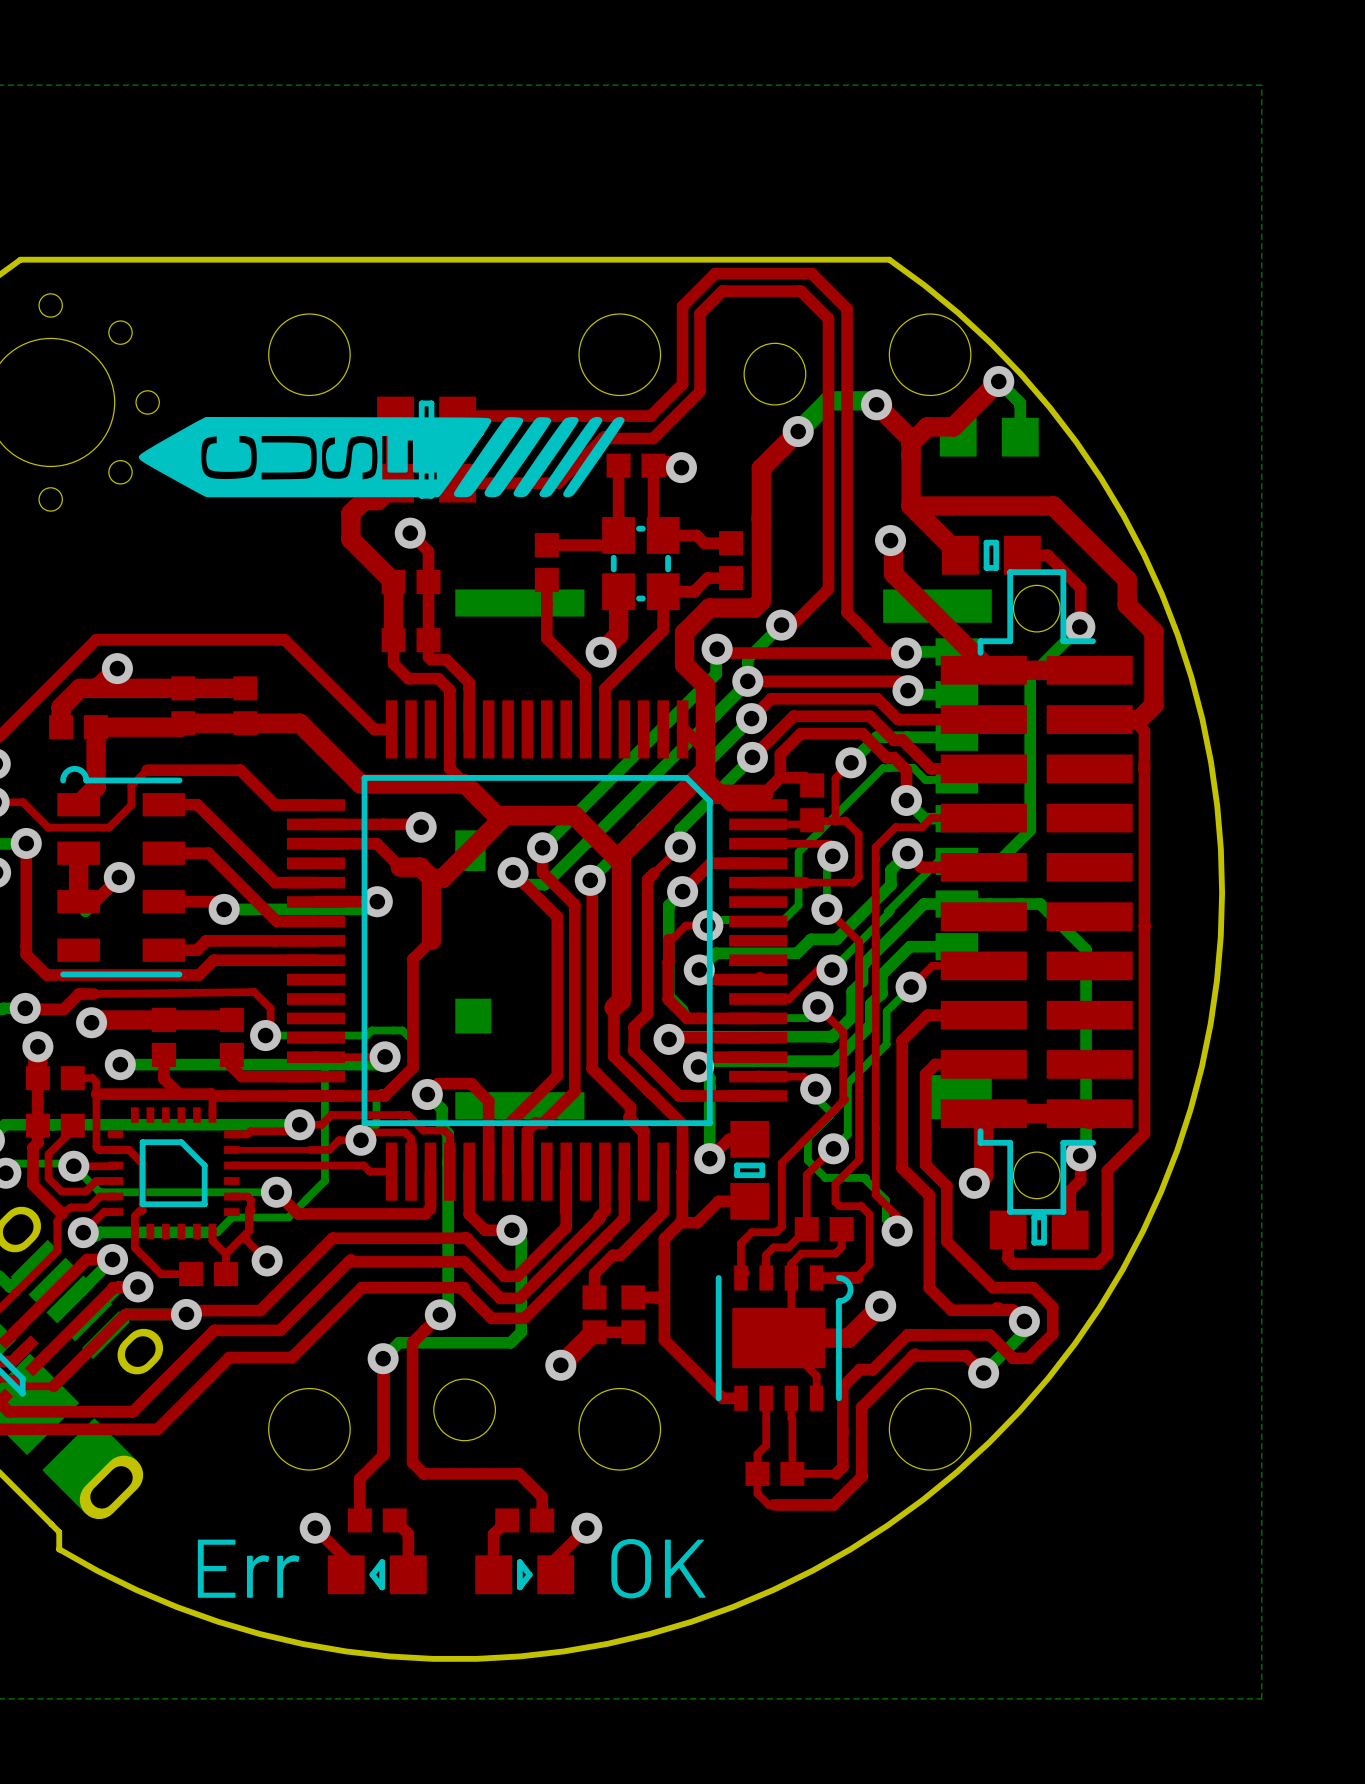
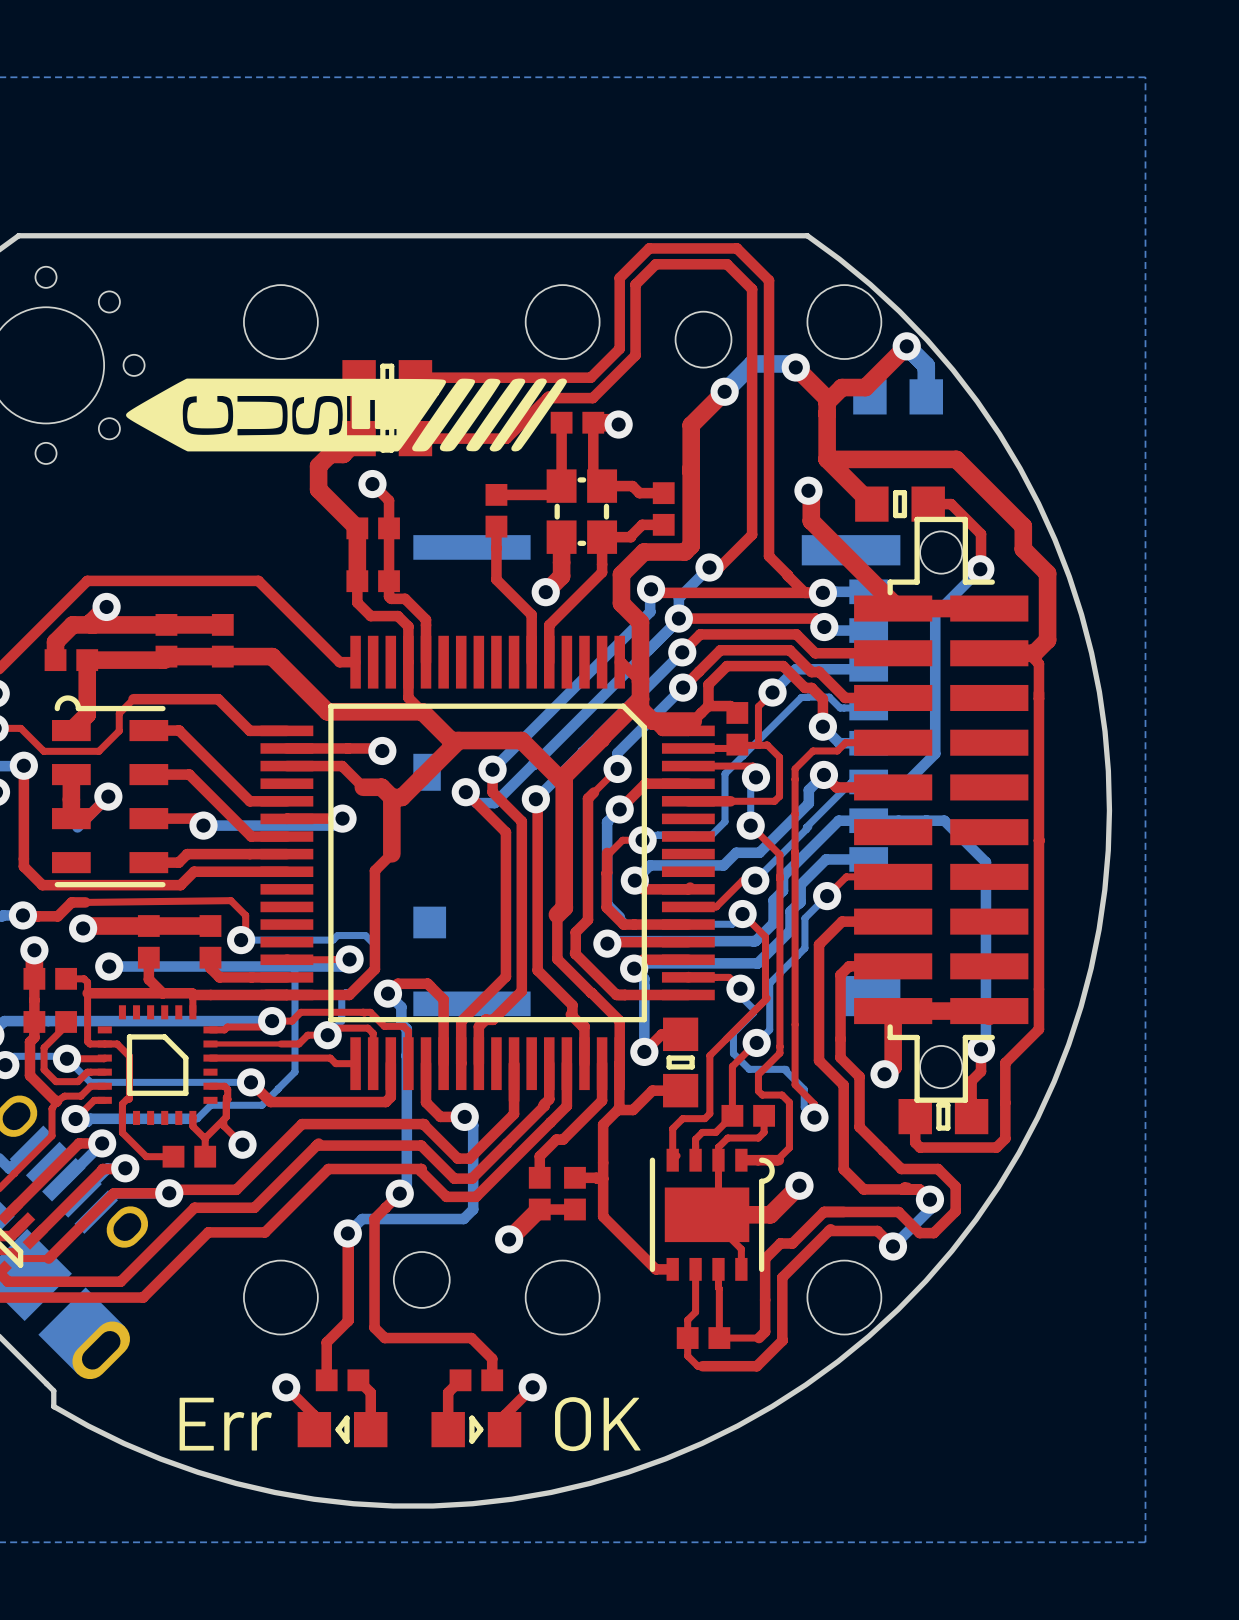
bottom track width: thin (998, 381) (1020, 403) (1020, 437) -> thick (906, 346) (926, 365) (926, 396)

